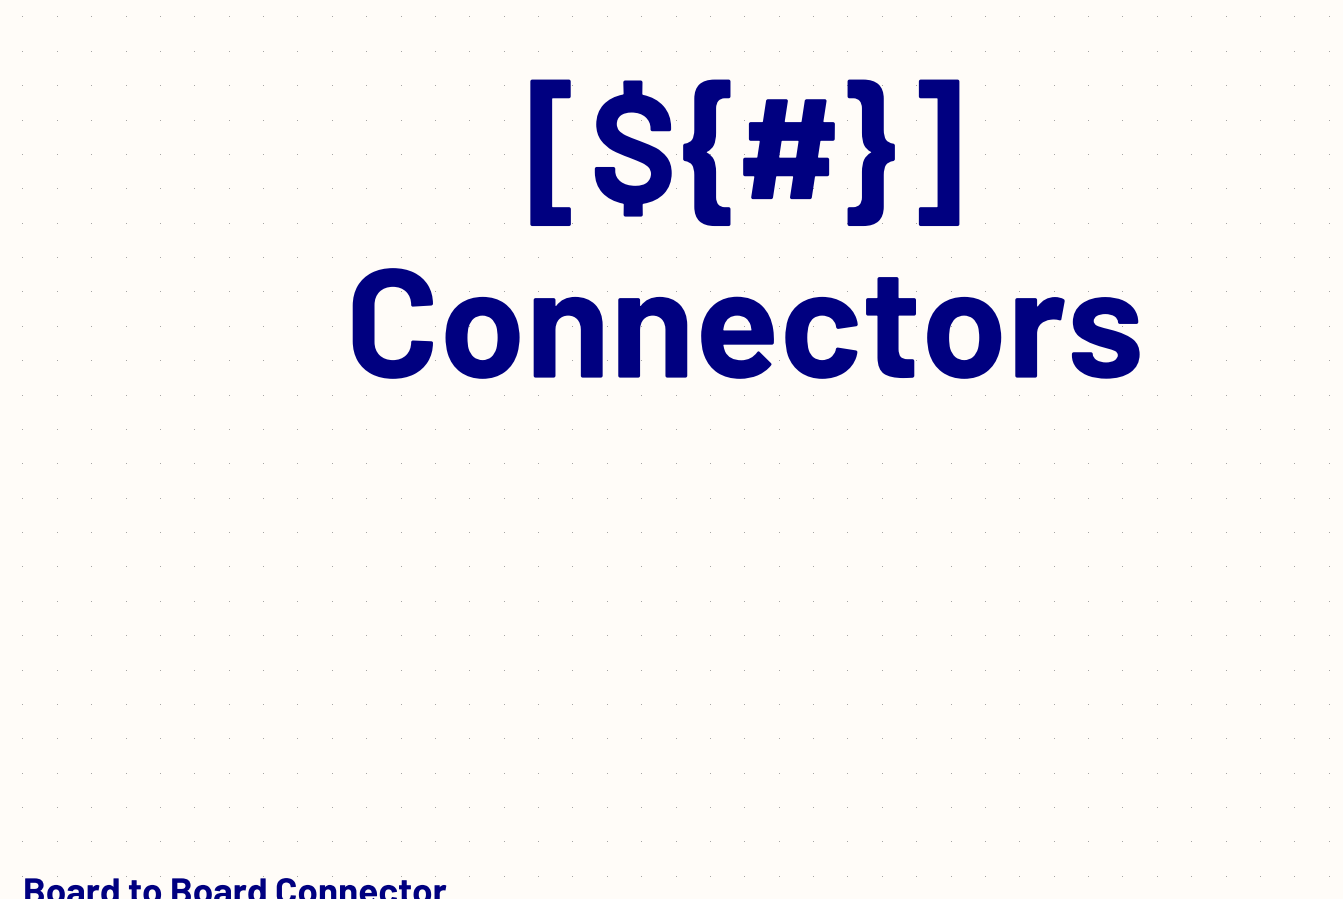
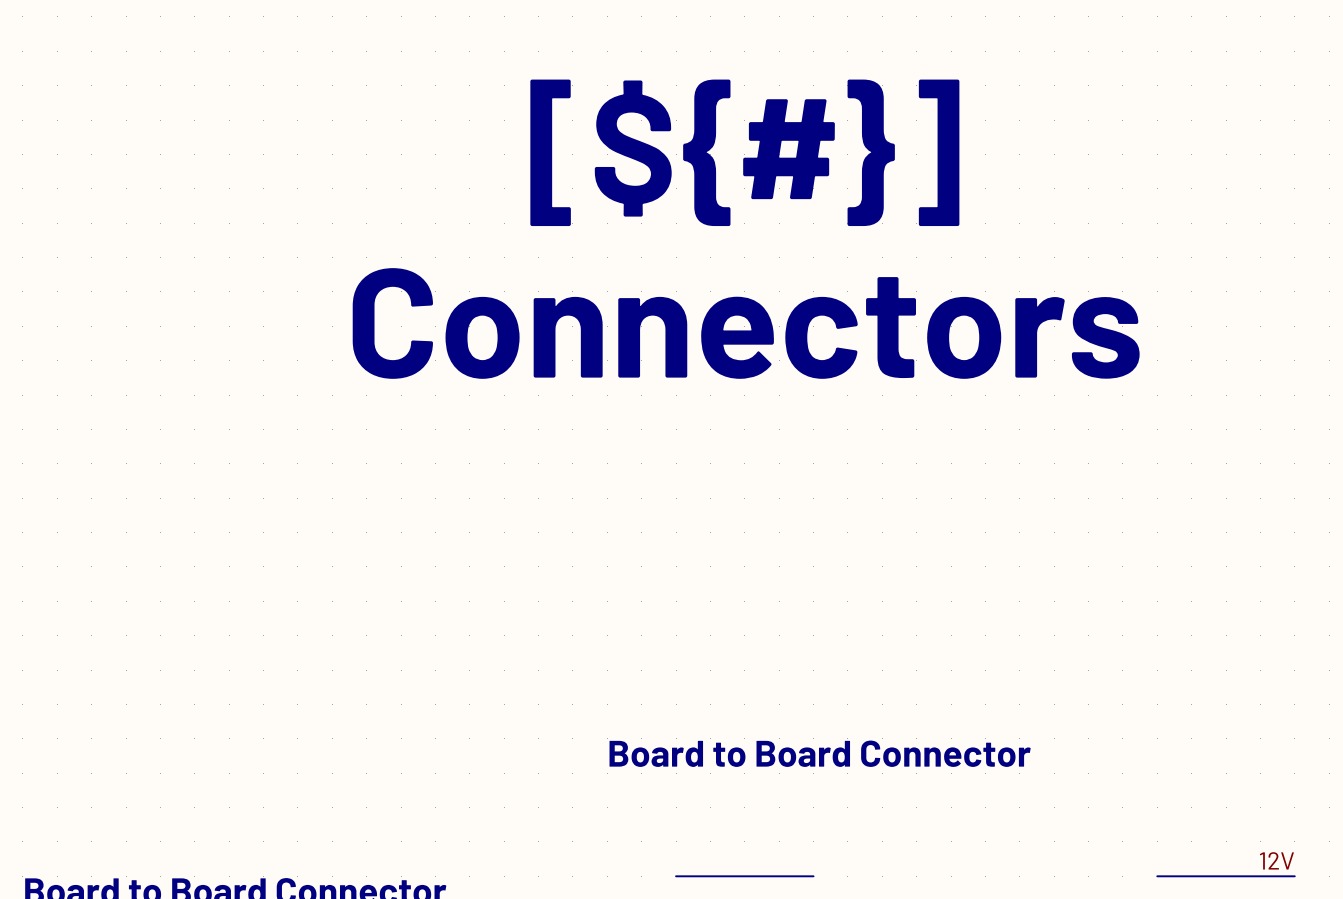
text: none -> Board to Board Connector (820, 753)
label: none -> 12V (1276, 860)
wire: none -> (676, 876) (813, 876)
wire: none -> (1157, 876) (1294, 876)

